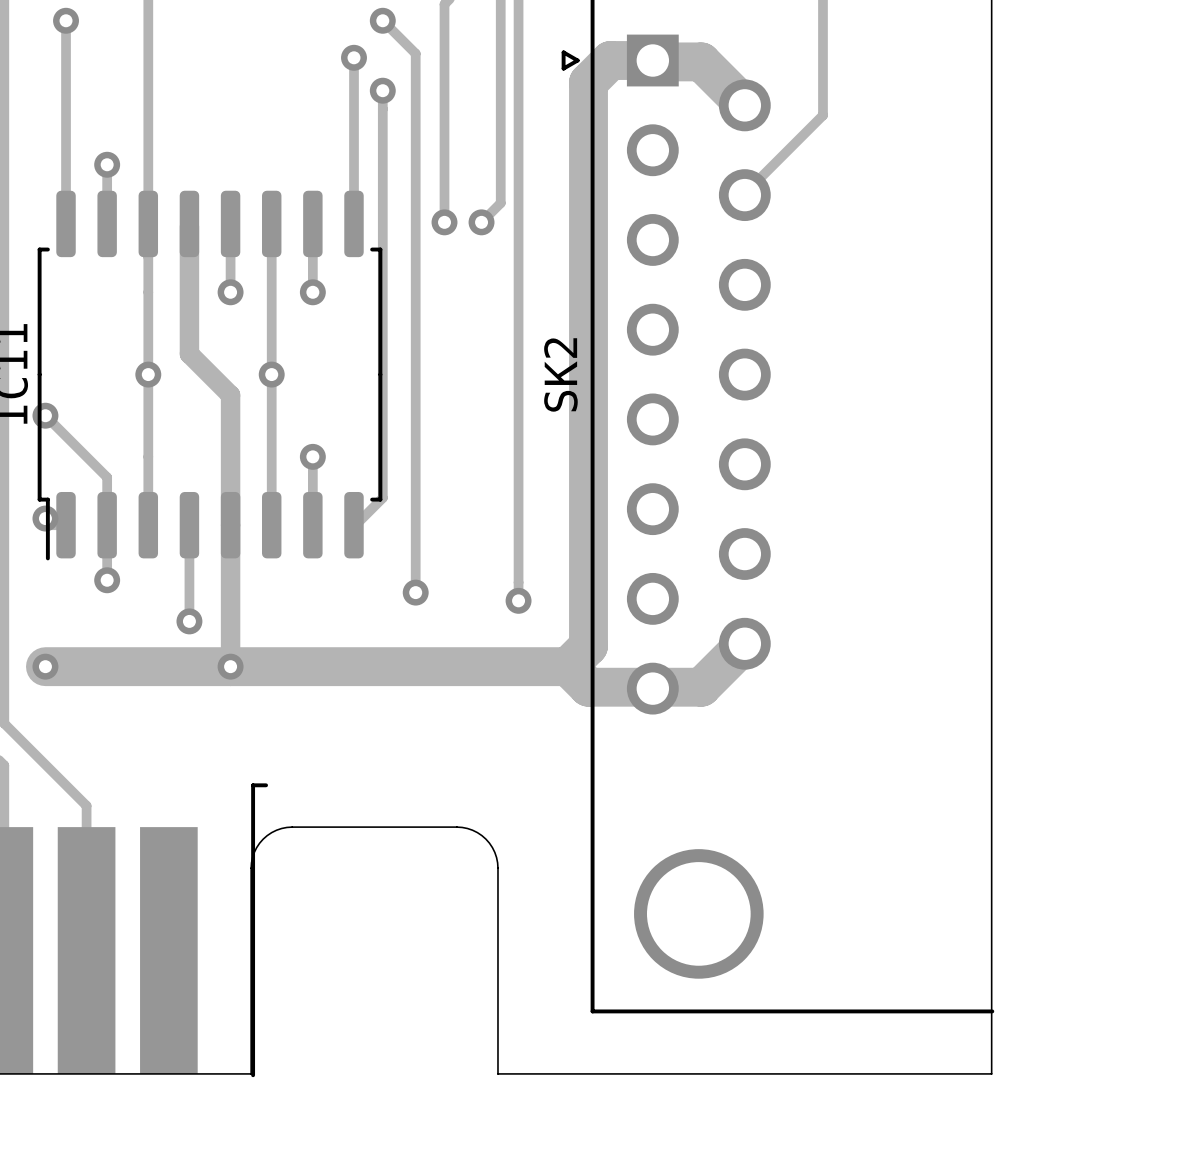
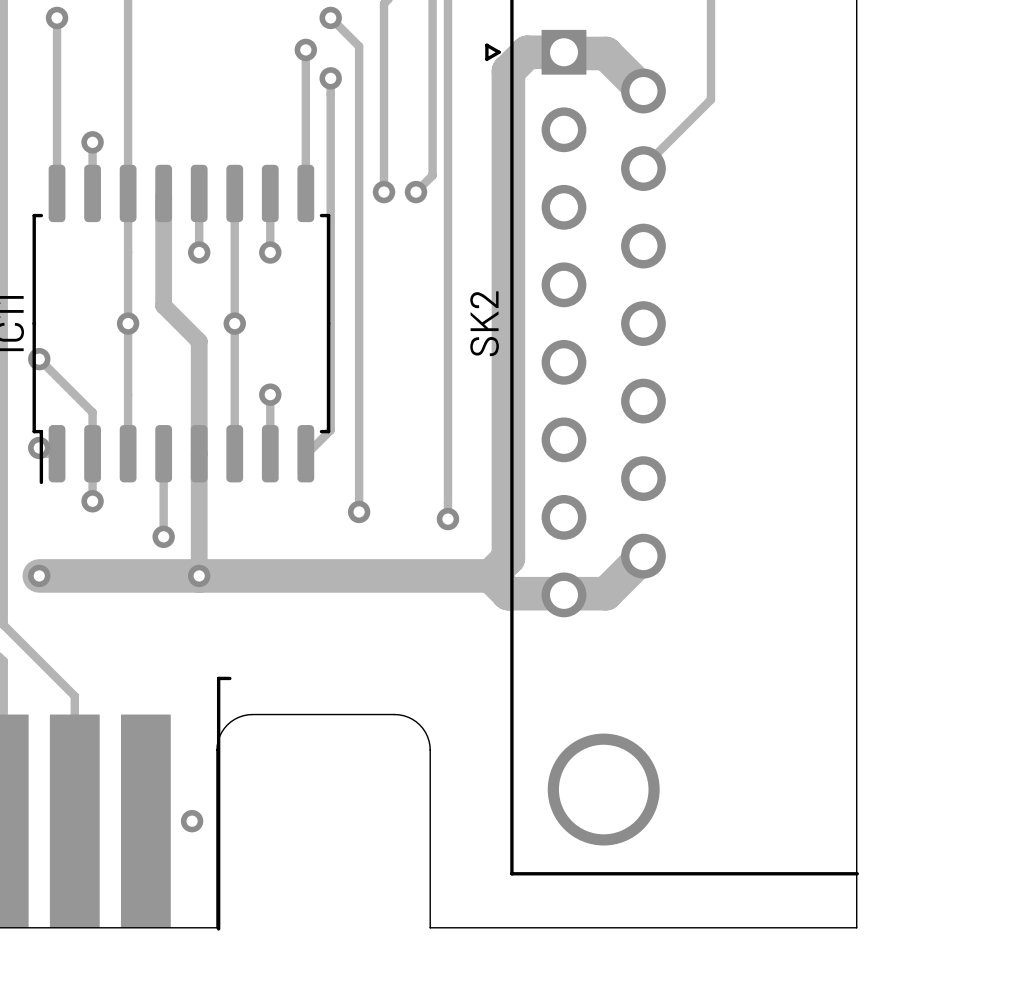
via: none -> (192, 821)

